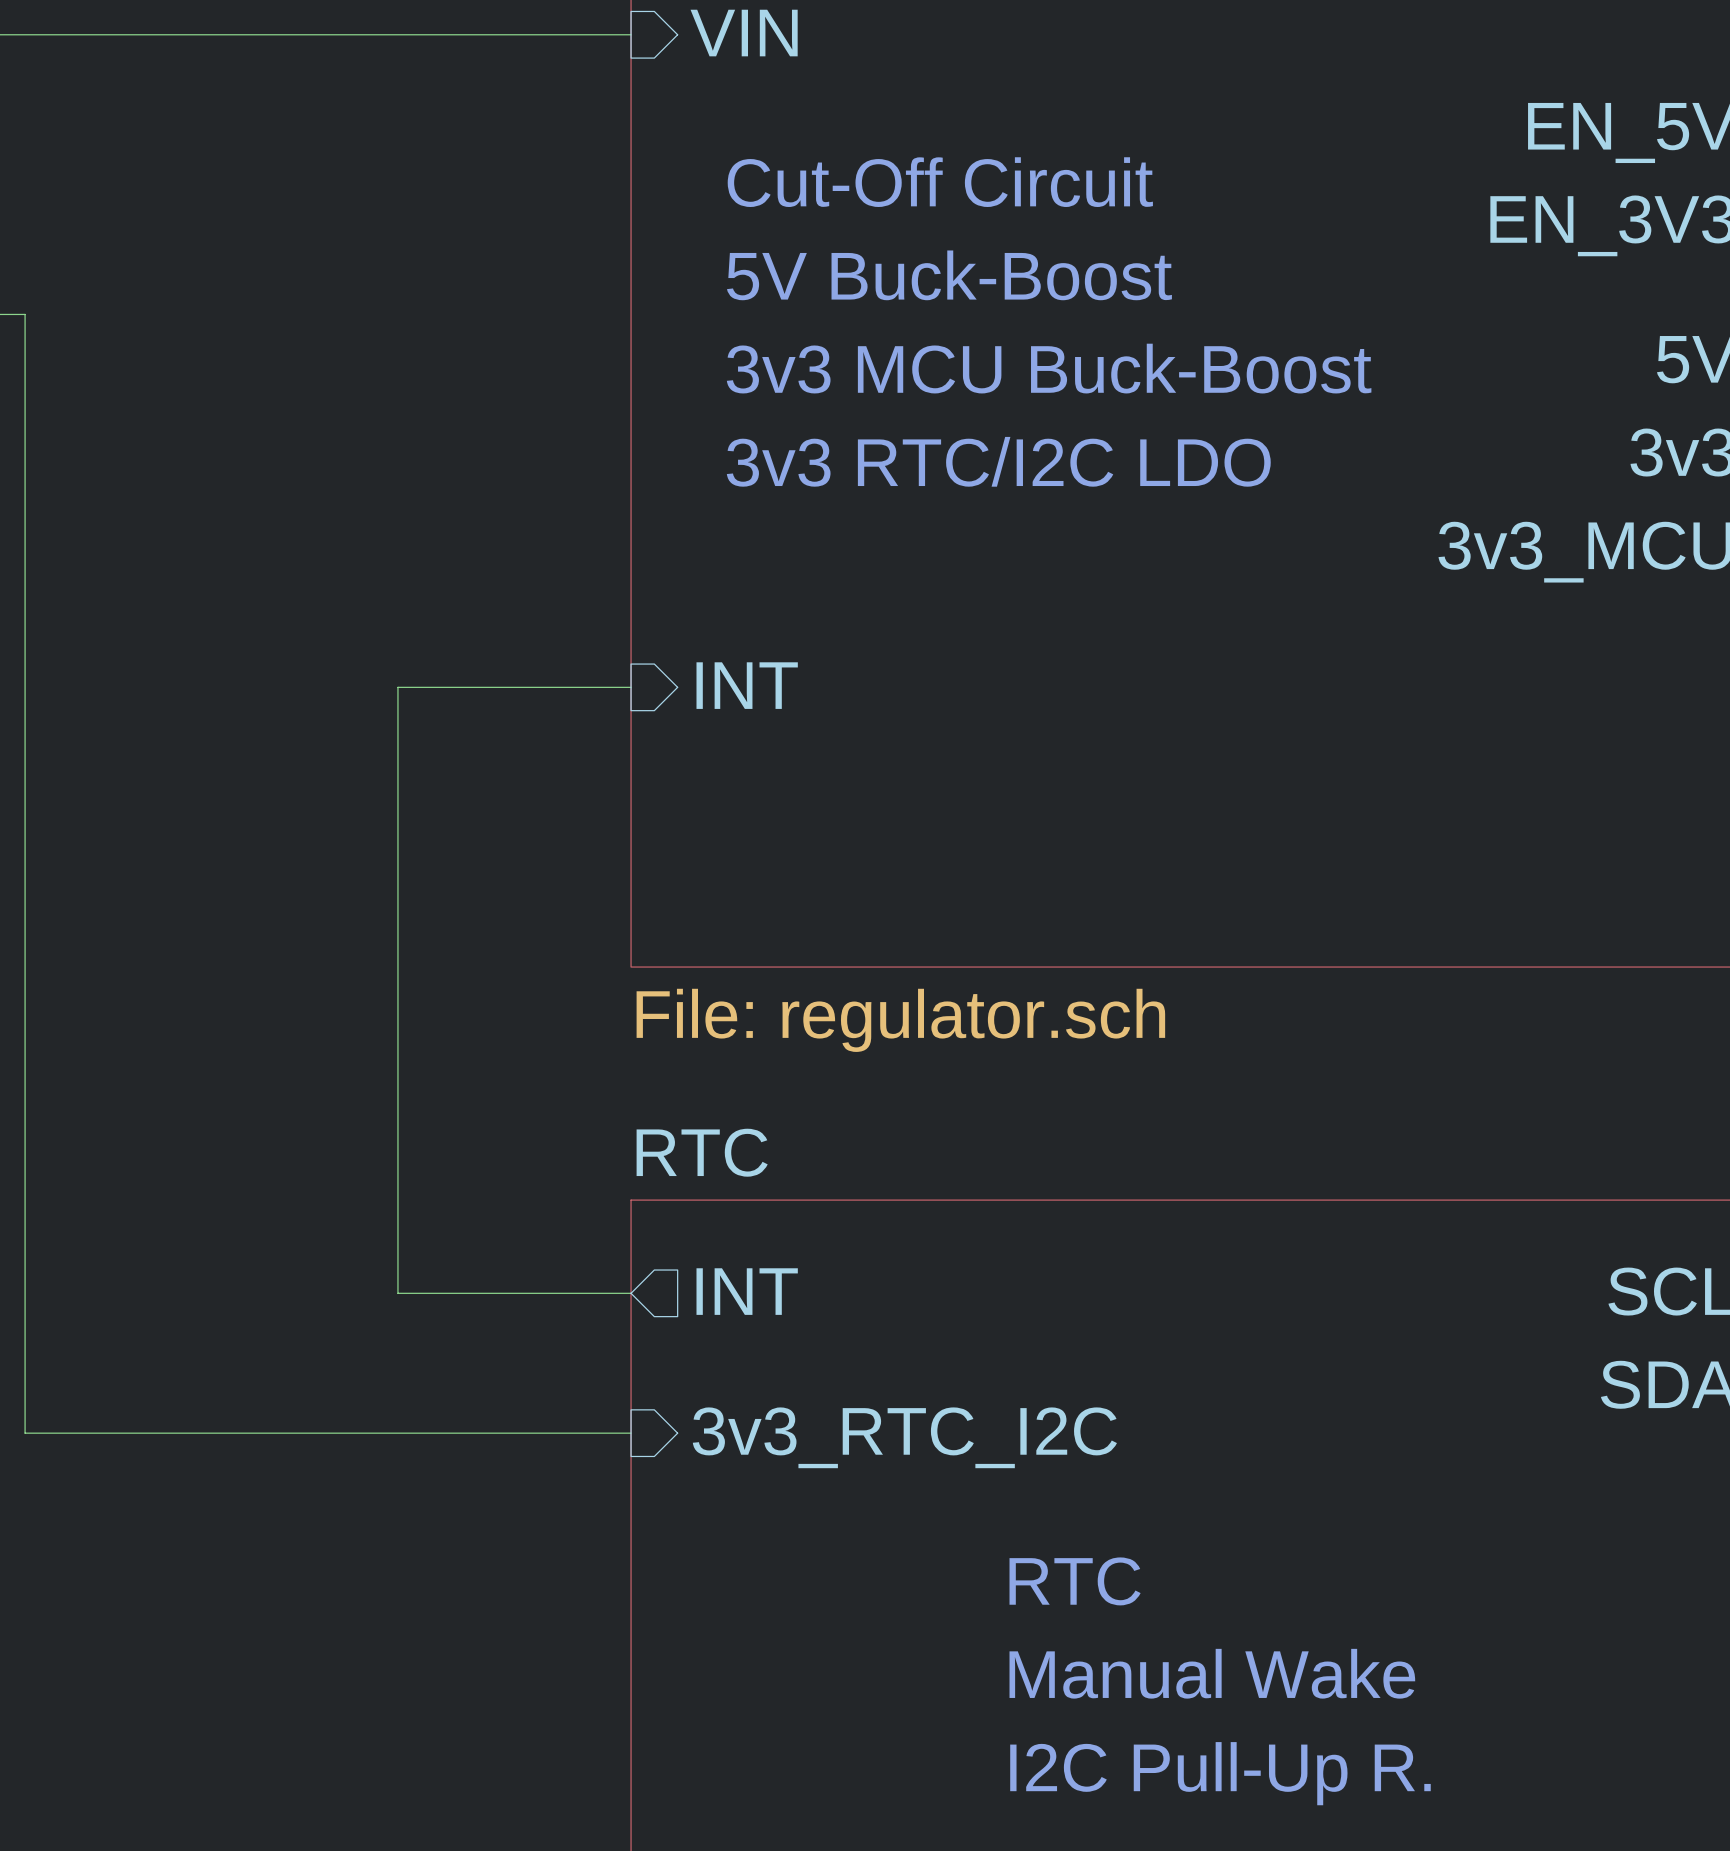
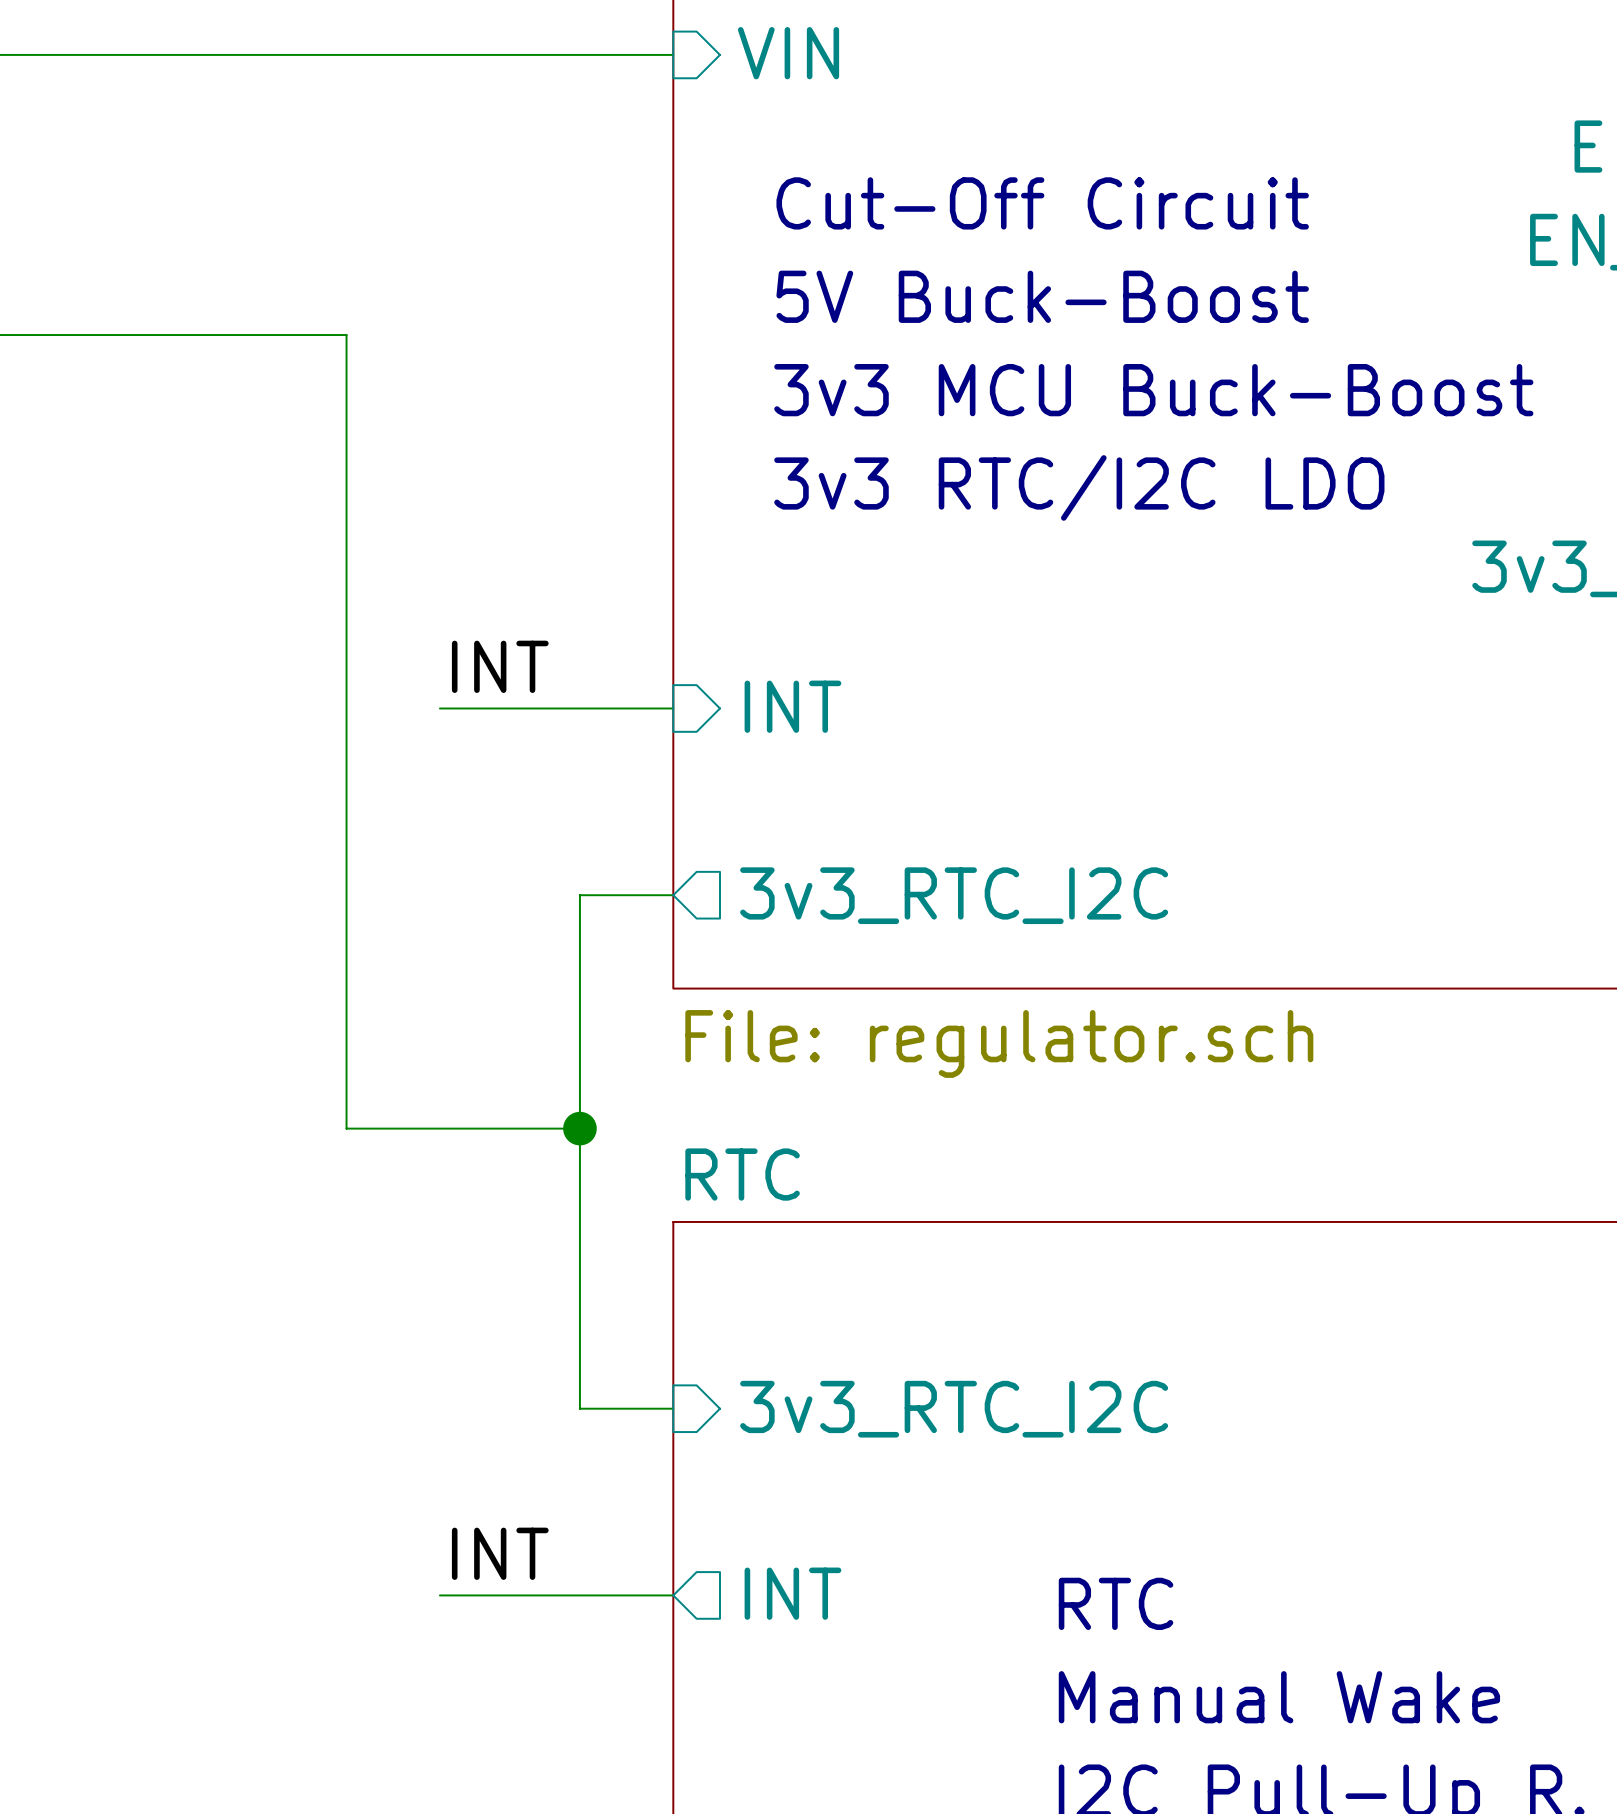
wire: (25, 314) (25, 1433) (631, 1433) -> (66, 335) (346, 335) (346, 1128) (579, 1128)
label: none -> INT (500, 666)
wire: (397, 687) (397, 1293) (631, 1293) -> none
wire: none -> (673, 895) (579, 895) (579, 1408) (673, 1408)
sheet pin: none -> 3v3_RTC_I2C (954, 895)
junction: none -> (579, 1128)
sheet pin position: INT (747, 1291) -> INT (792, 1593)
sheet pin position: 3v3_RTC_I2C (904, 1437) -> 3v3_RTC_I2C (954, 1409)
label: none -> INT (500, 1553)
wire: none -> (439, 1595) (673, 1595)

